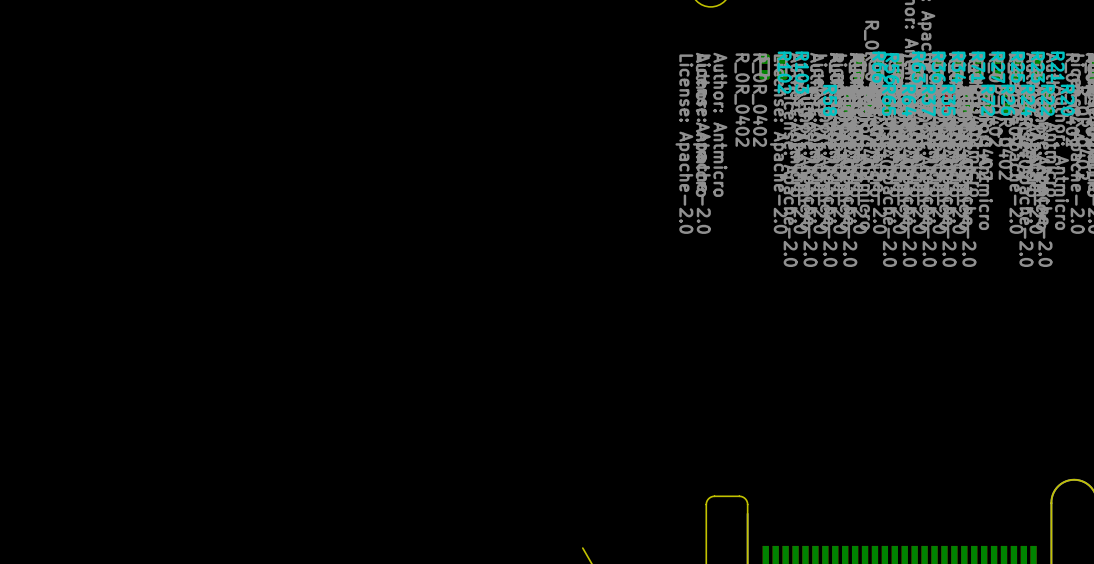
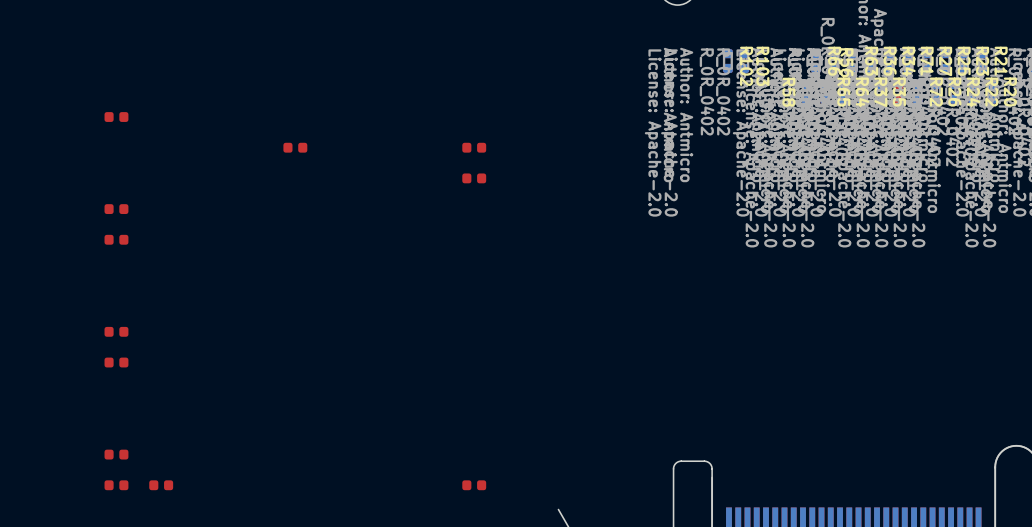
part: none -> (116, 117)
part: none -> (295, 147)
part: none -> (474, 147)
part: none -> (474, 178)
part: none -> (116, 209)
part: none -> (116, 239)
part: none -> (116, 331)
part: none -> (116, 362)
part: none -> (116, 454)
part: none -> (116, 485)
part: none -> (161, 485)
part: none -> (474, 485)

